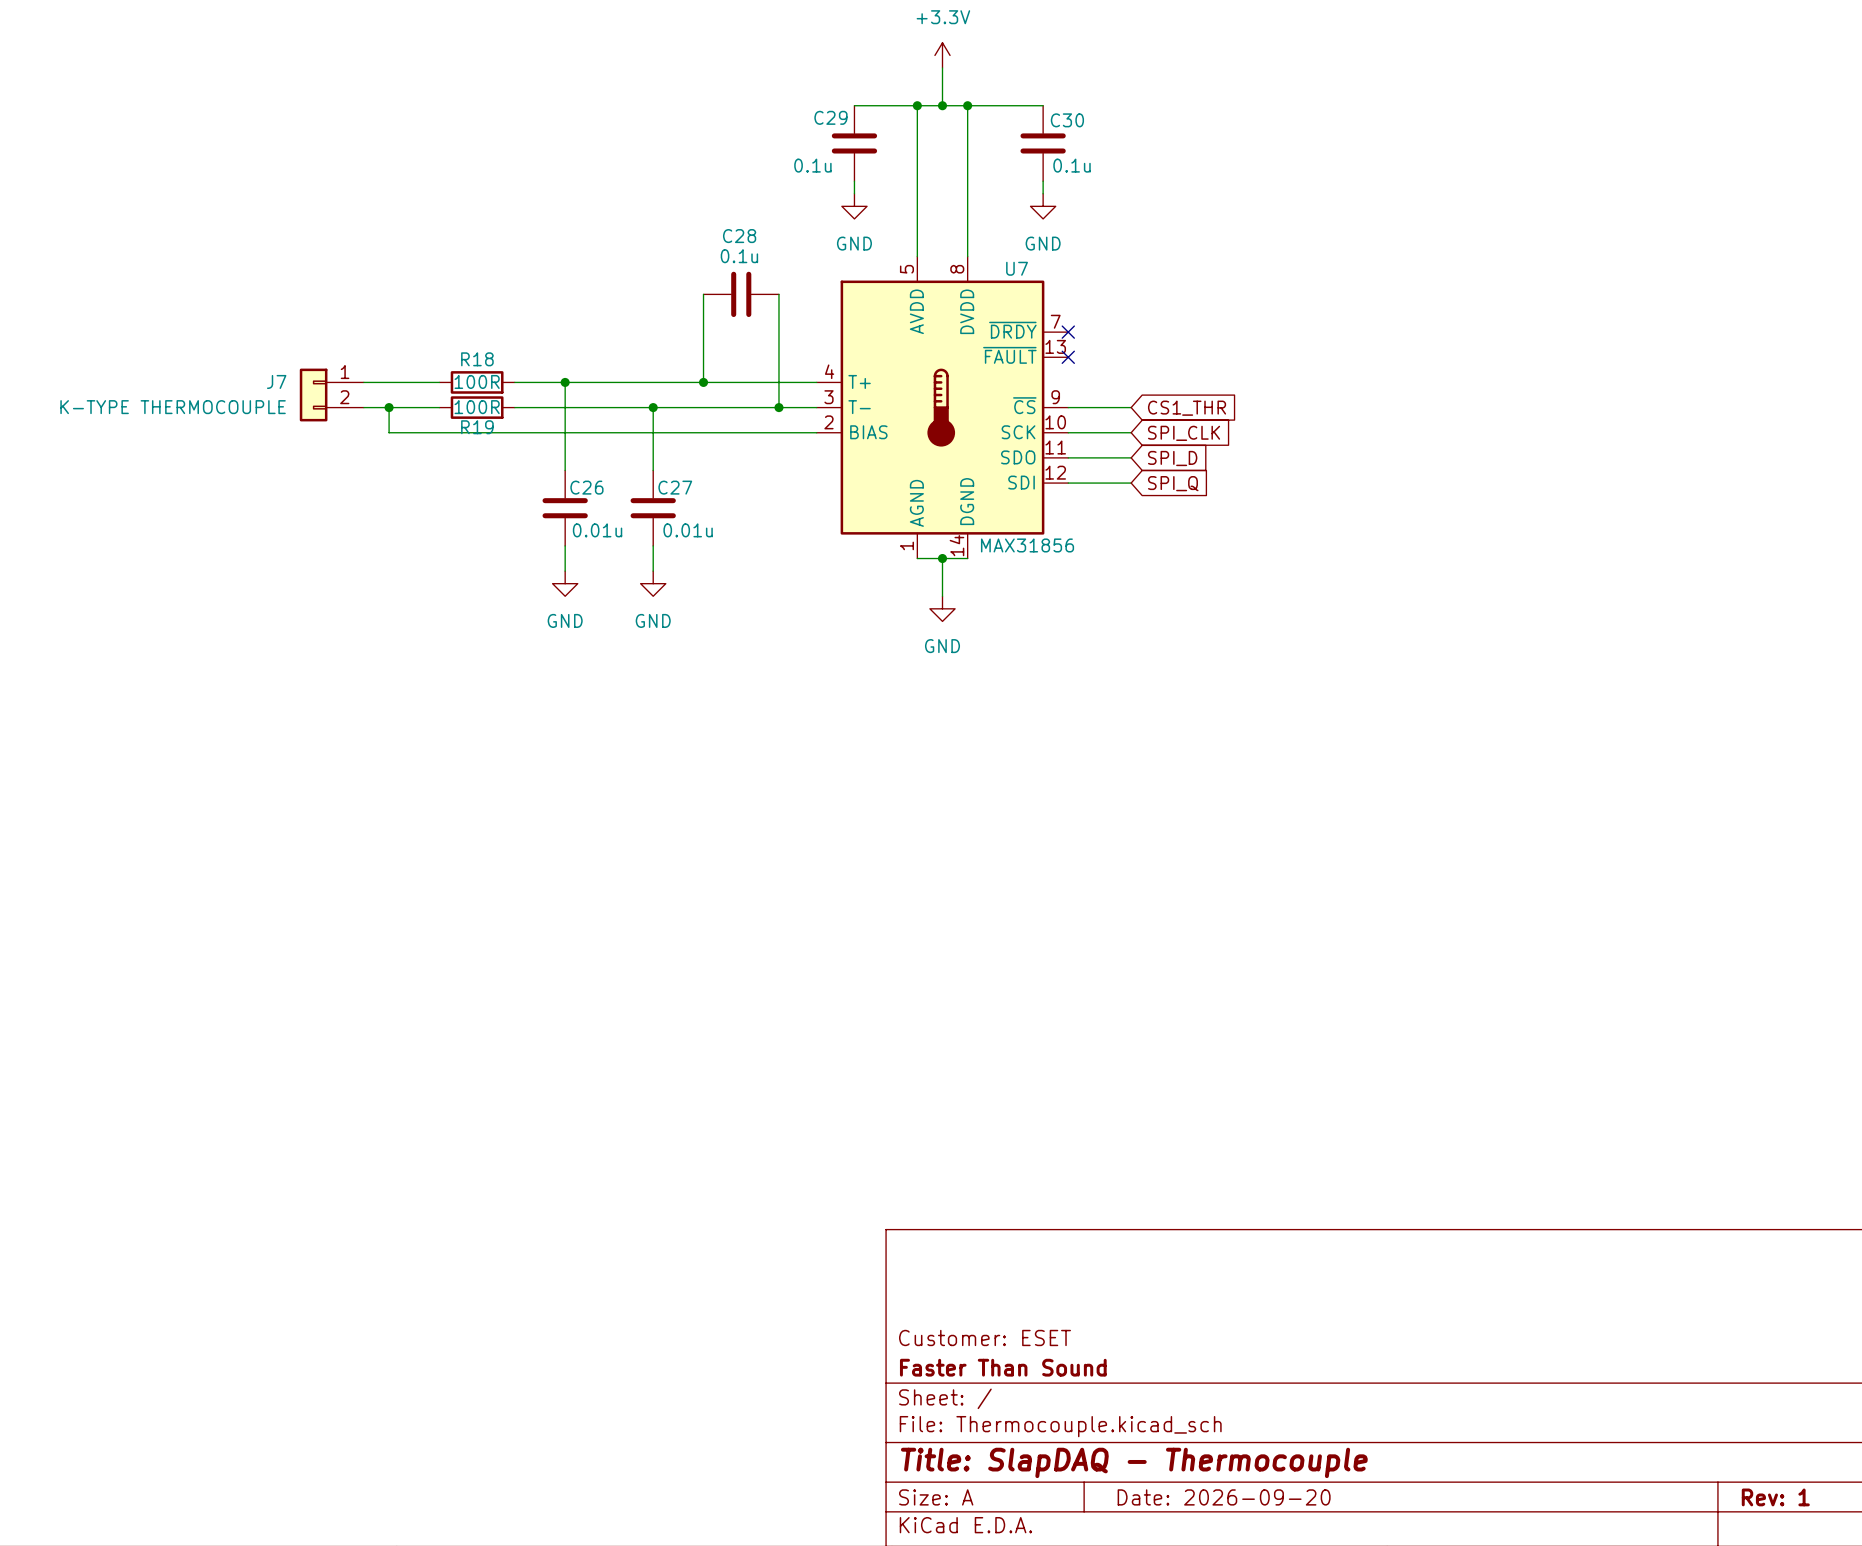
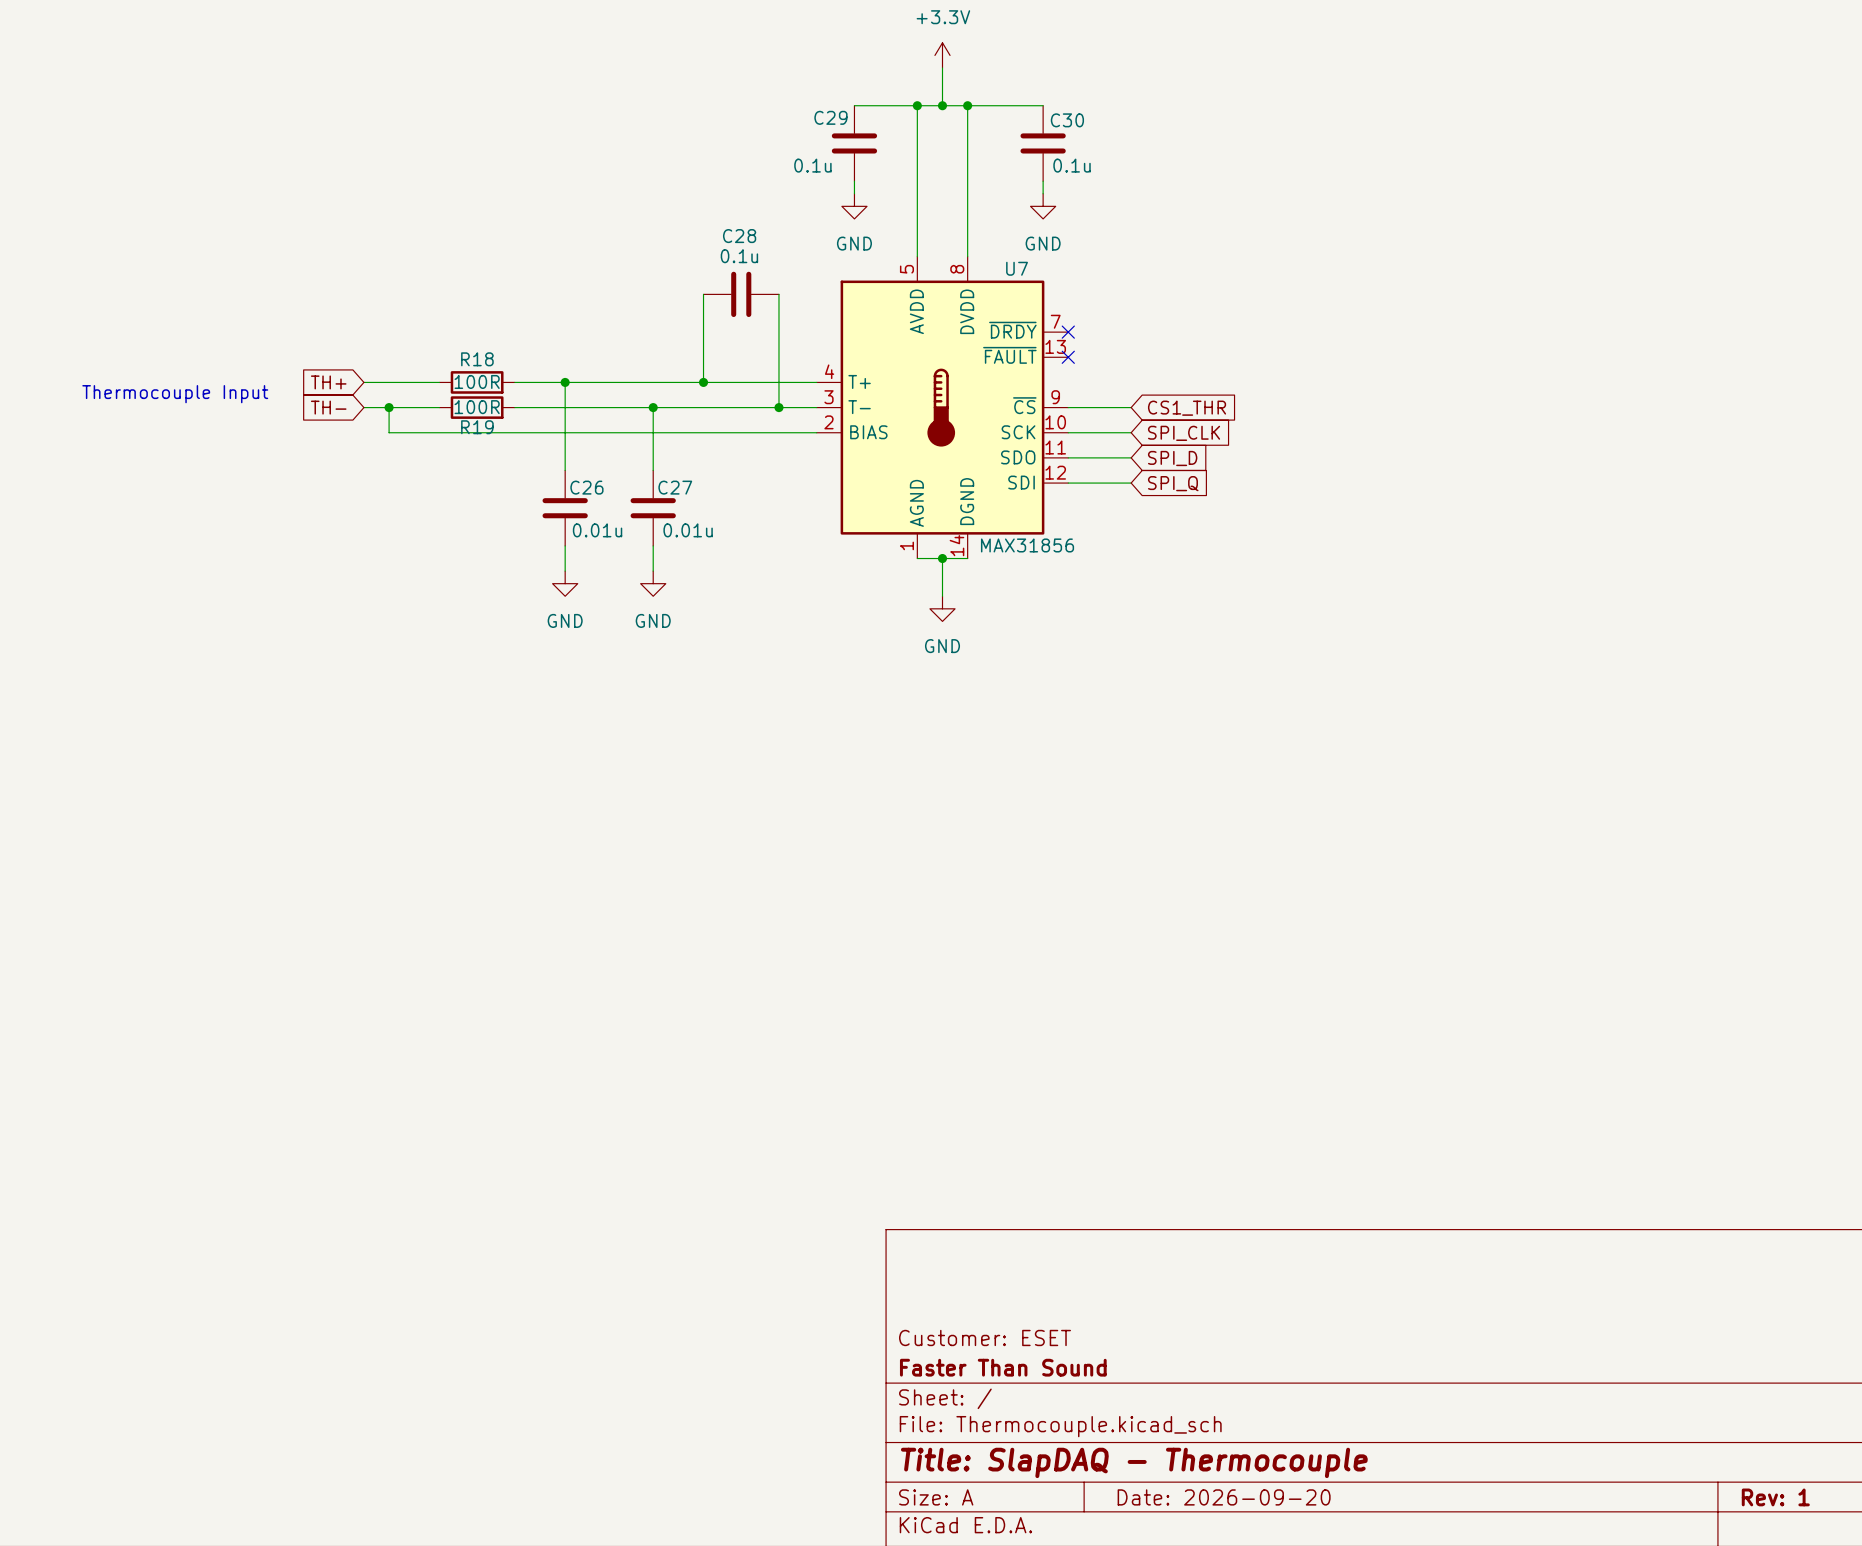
global label: none -> TH+ (328, 382)
text: none -> Thermocouple Input (175, 394)
J7: K-TYPE THERMOCOUPLE (331, 395) -> none
global label: none -> TH- (328, 407)

